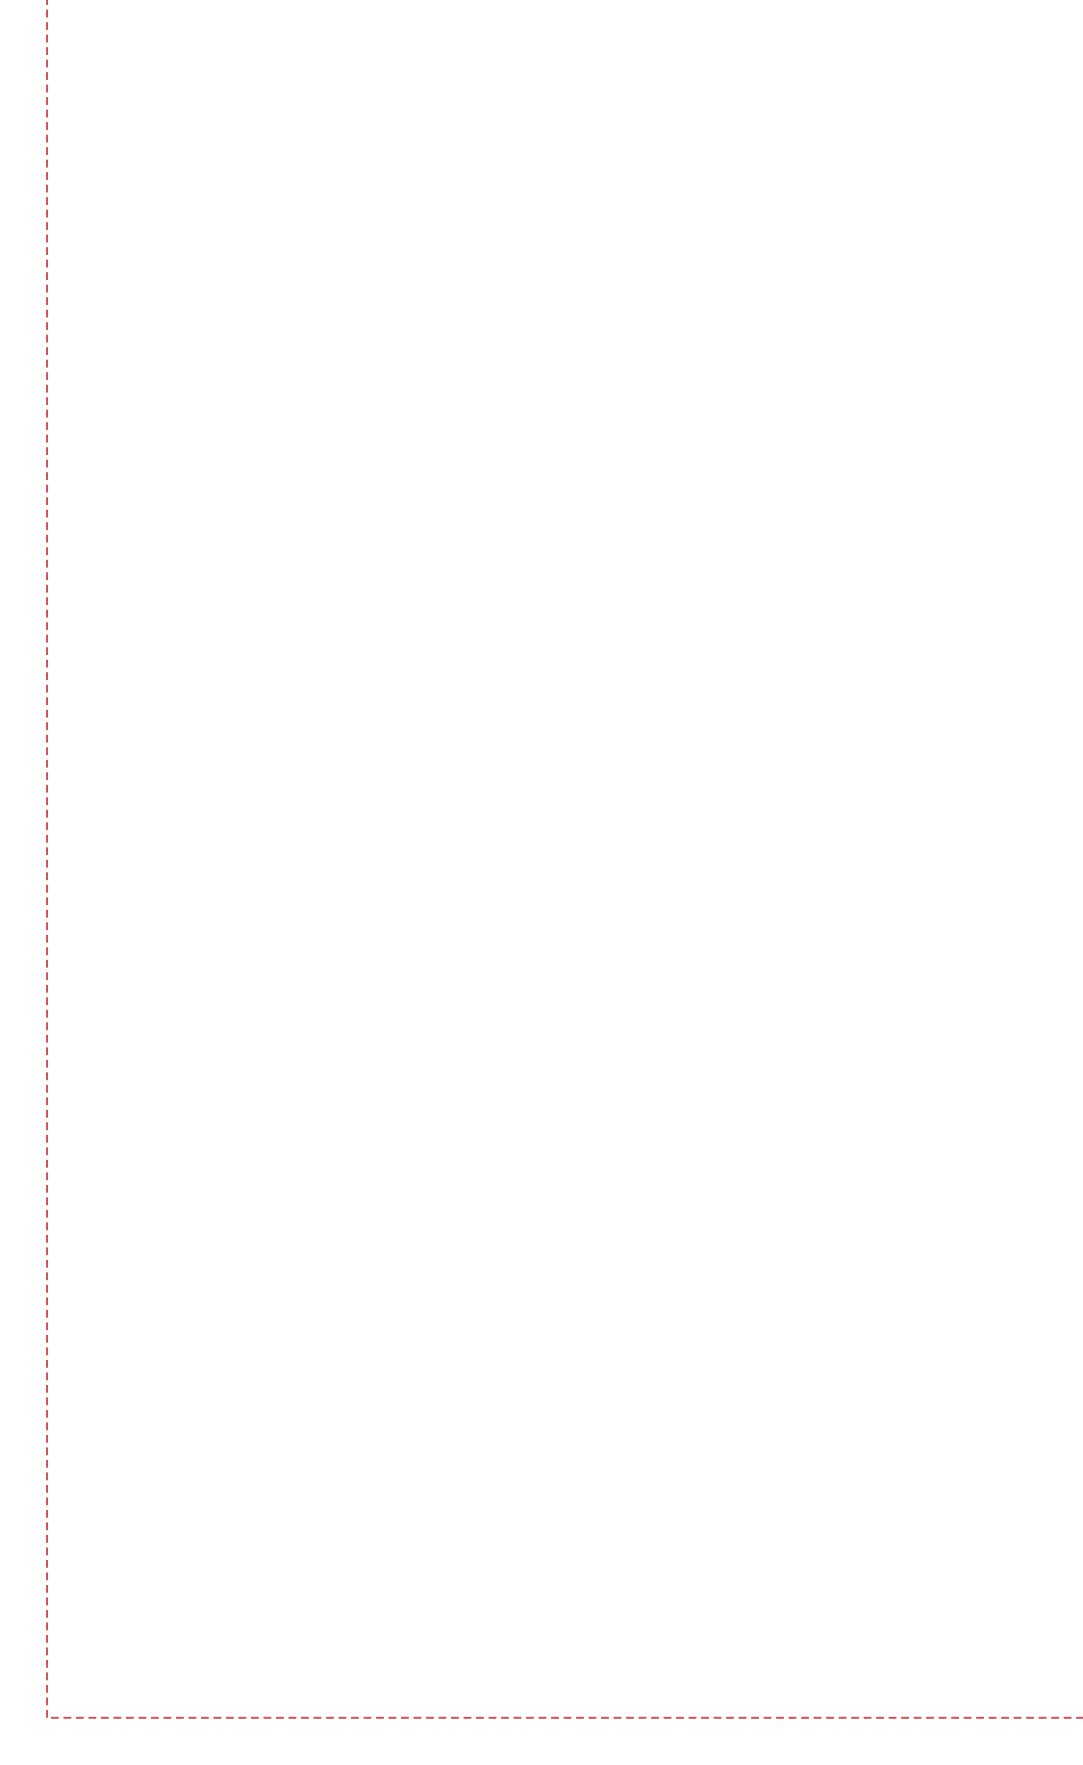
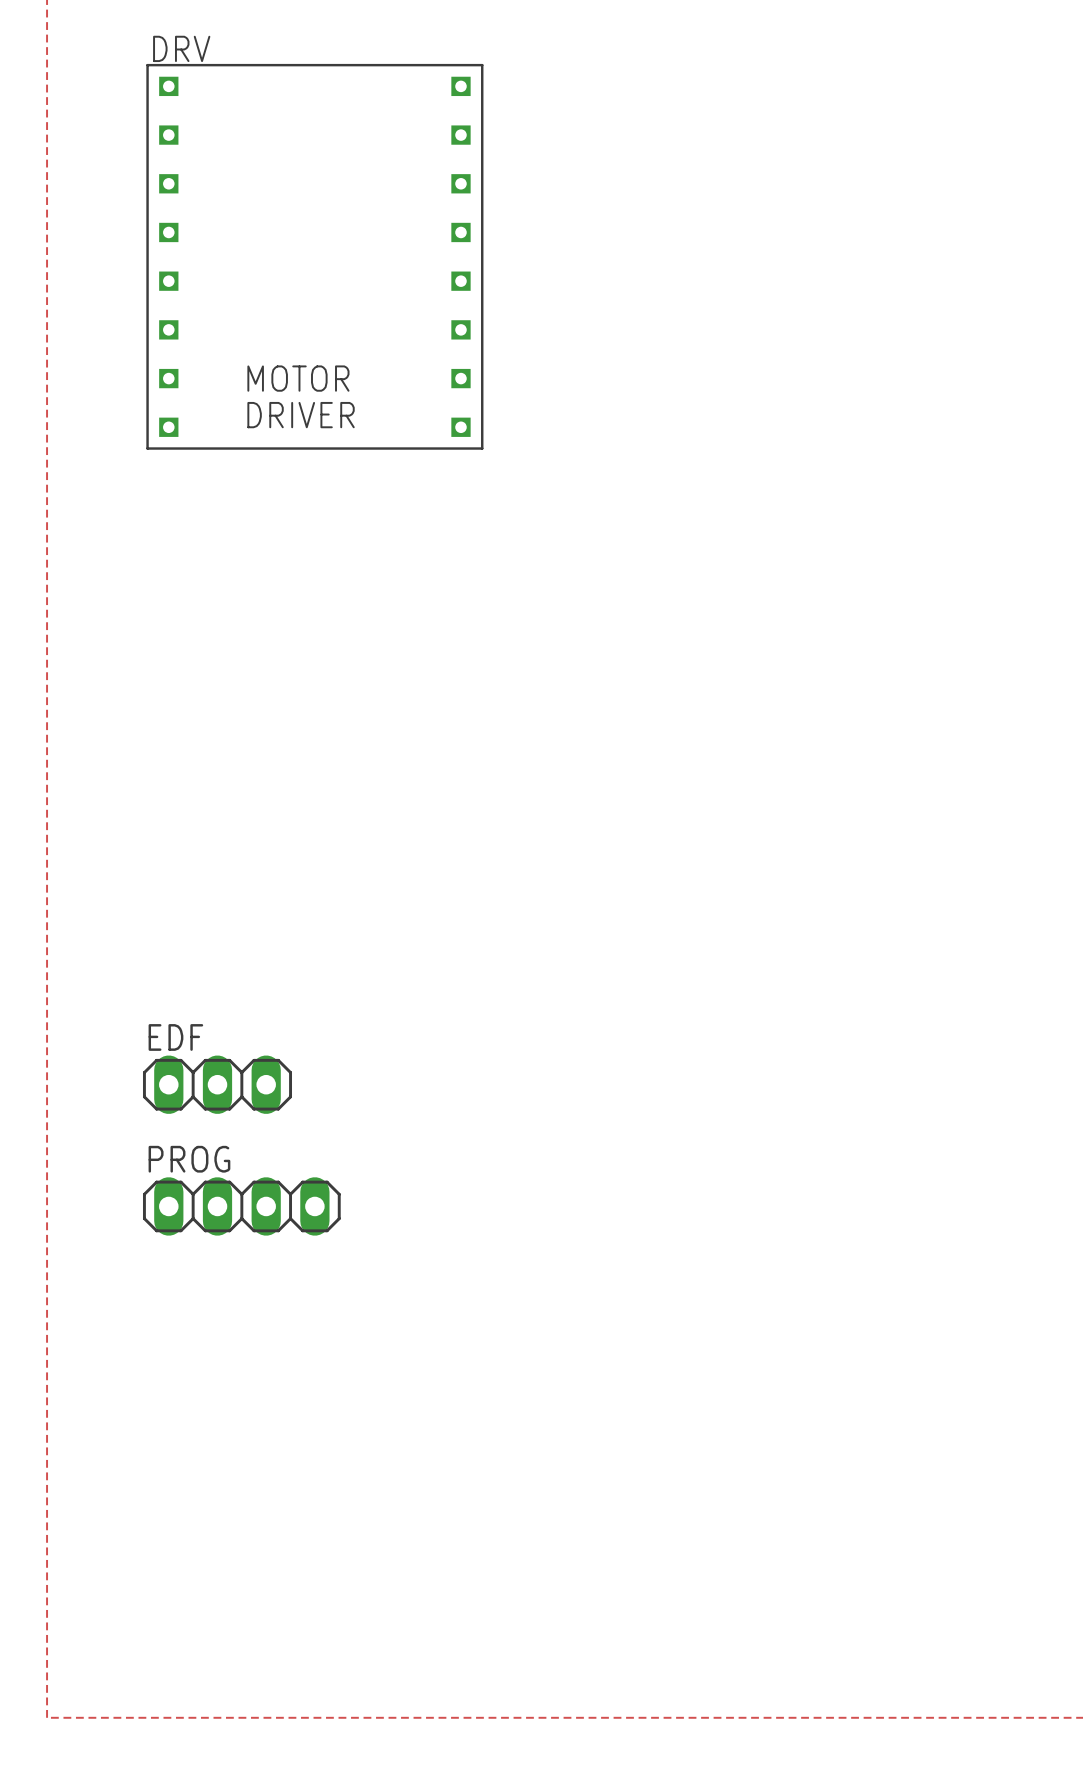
DRV: none -> (314, 256)
EDF: none -> (217, 1084)
PROG: none -> (241, 1206)

